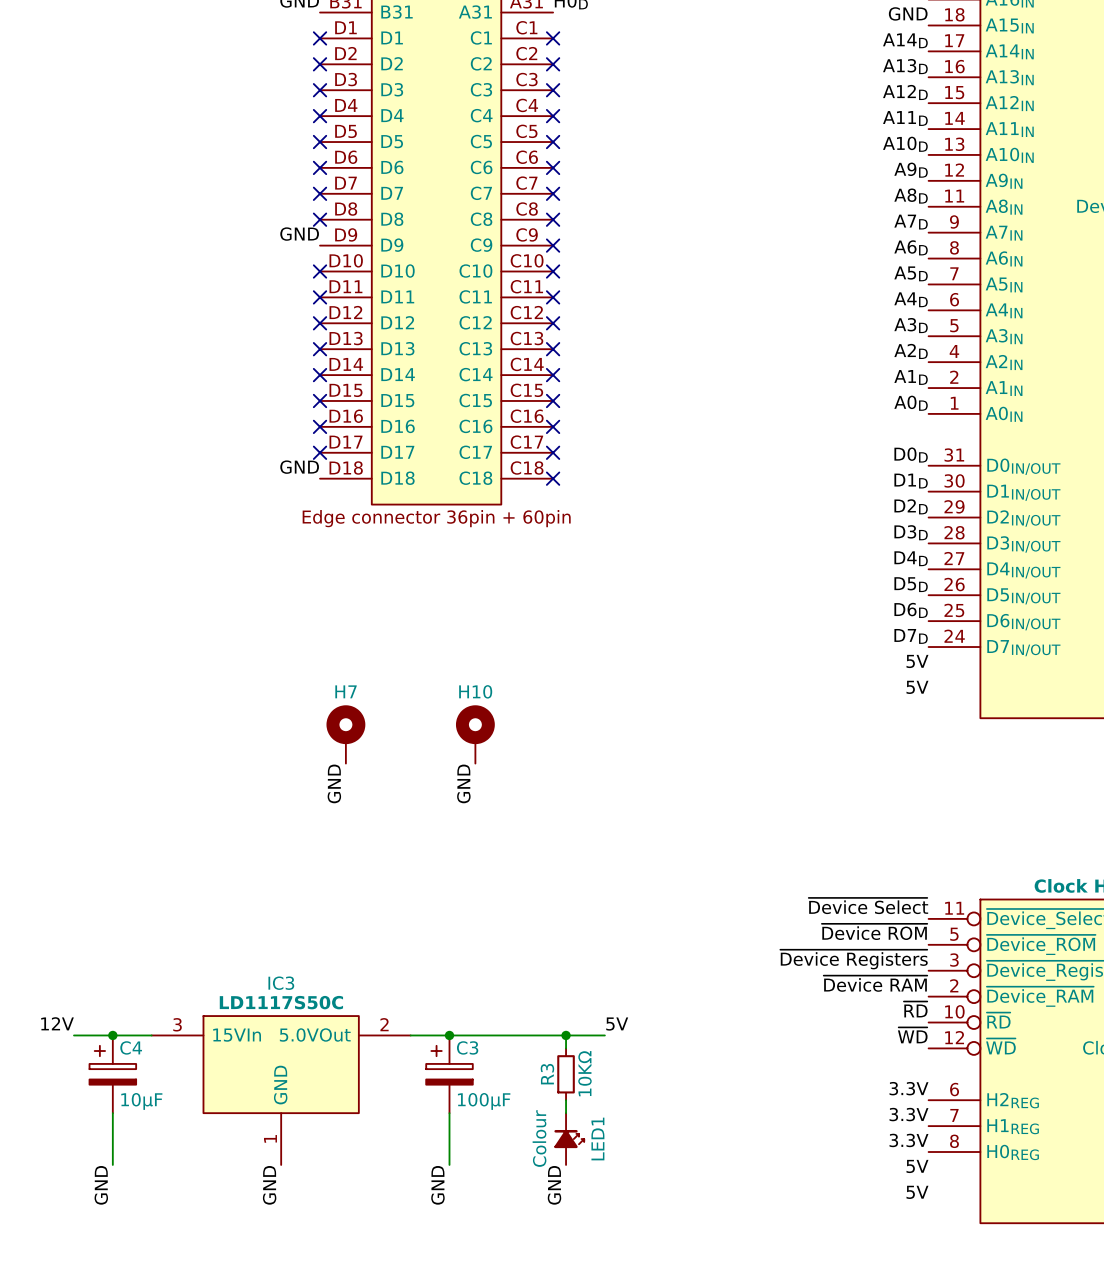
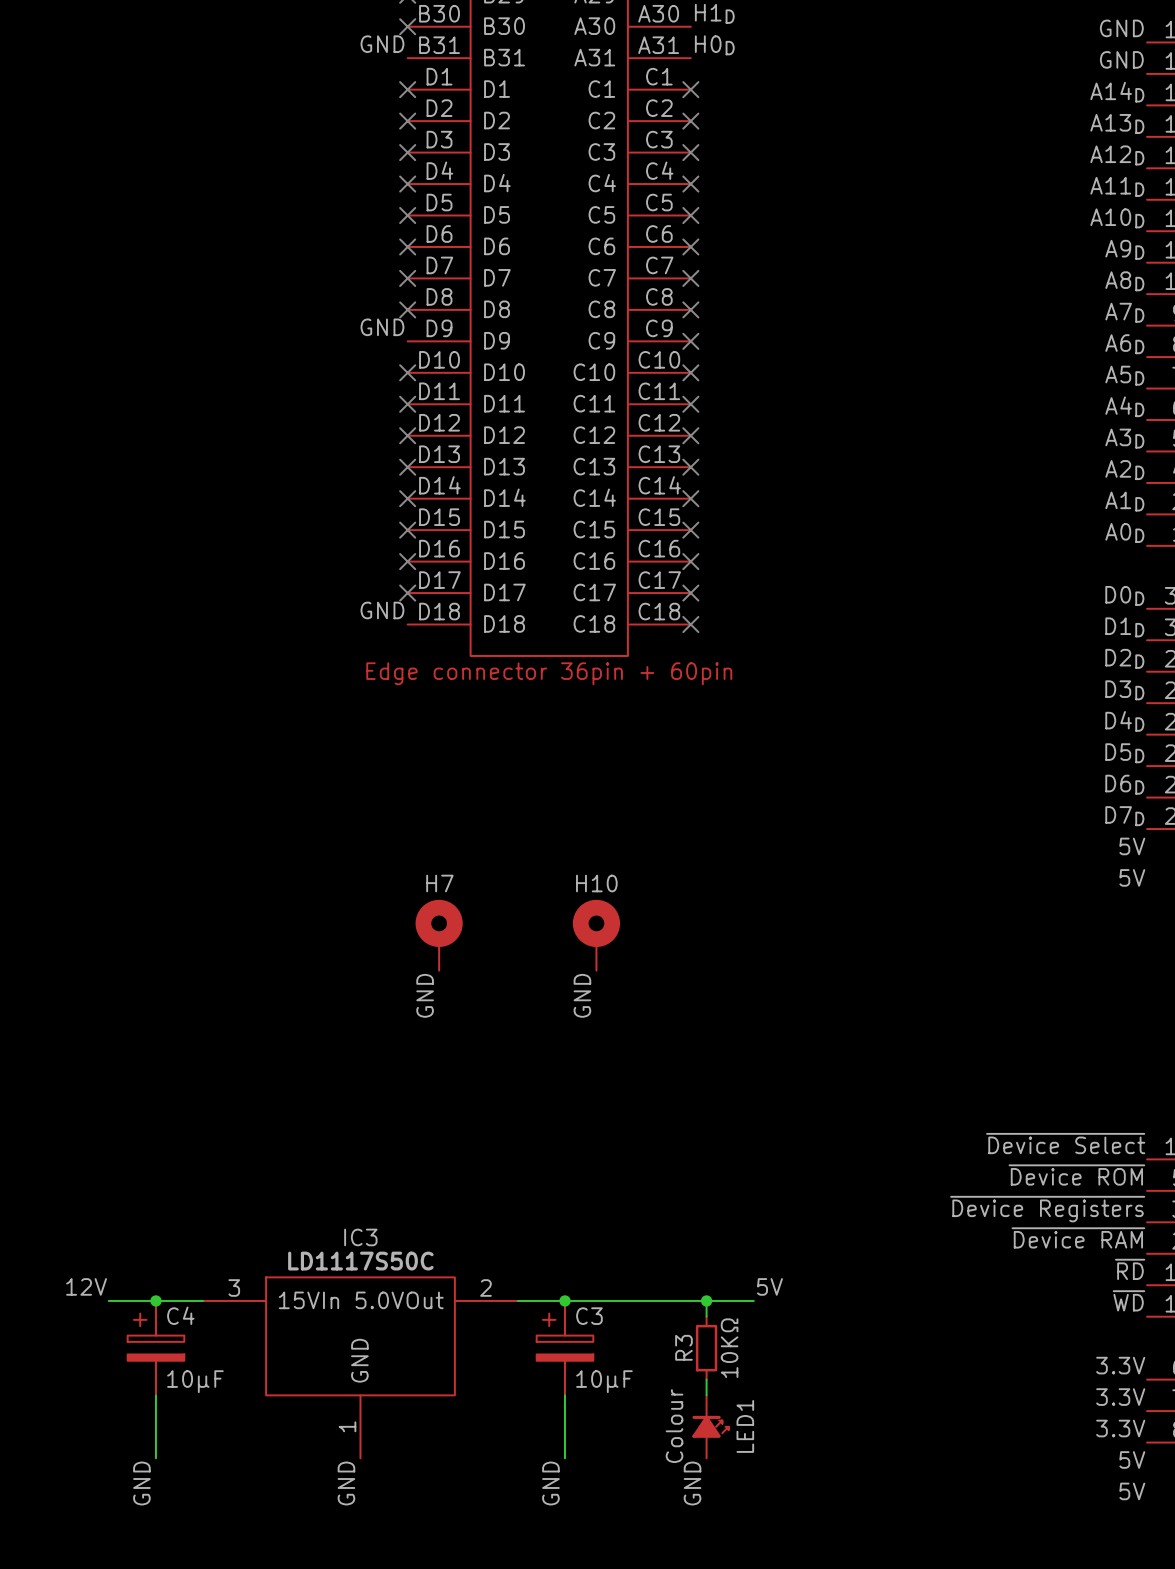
C3 value: 100μF (484, 1101) -> 10μF (604, 1381)

